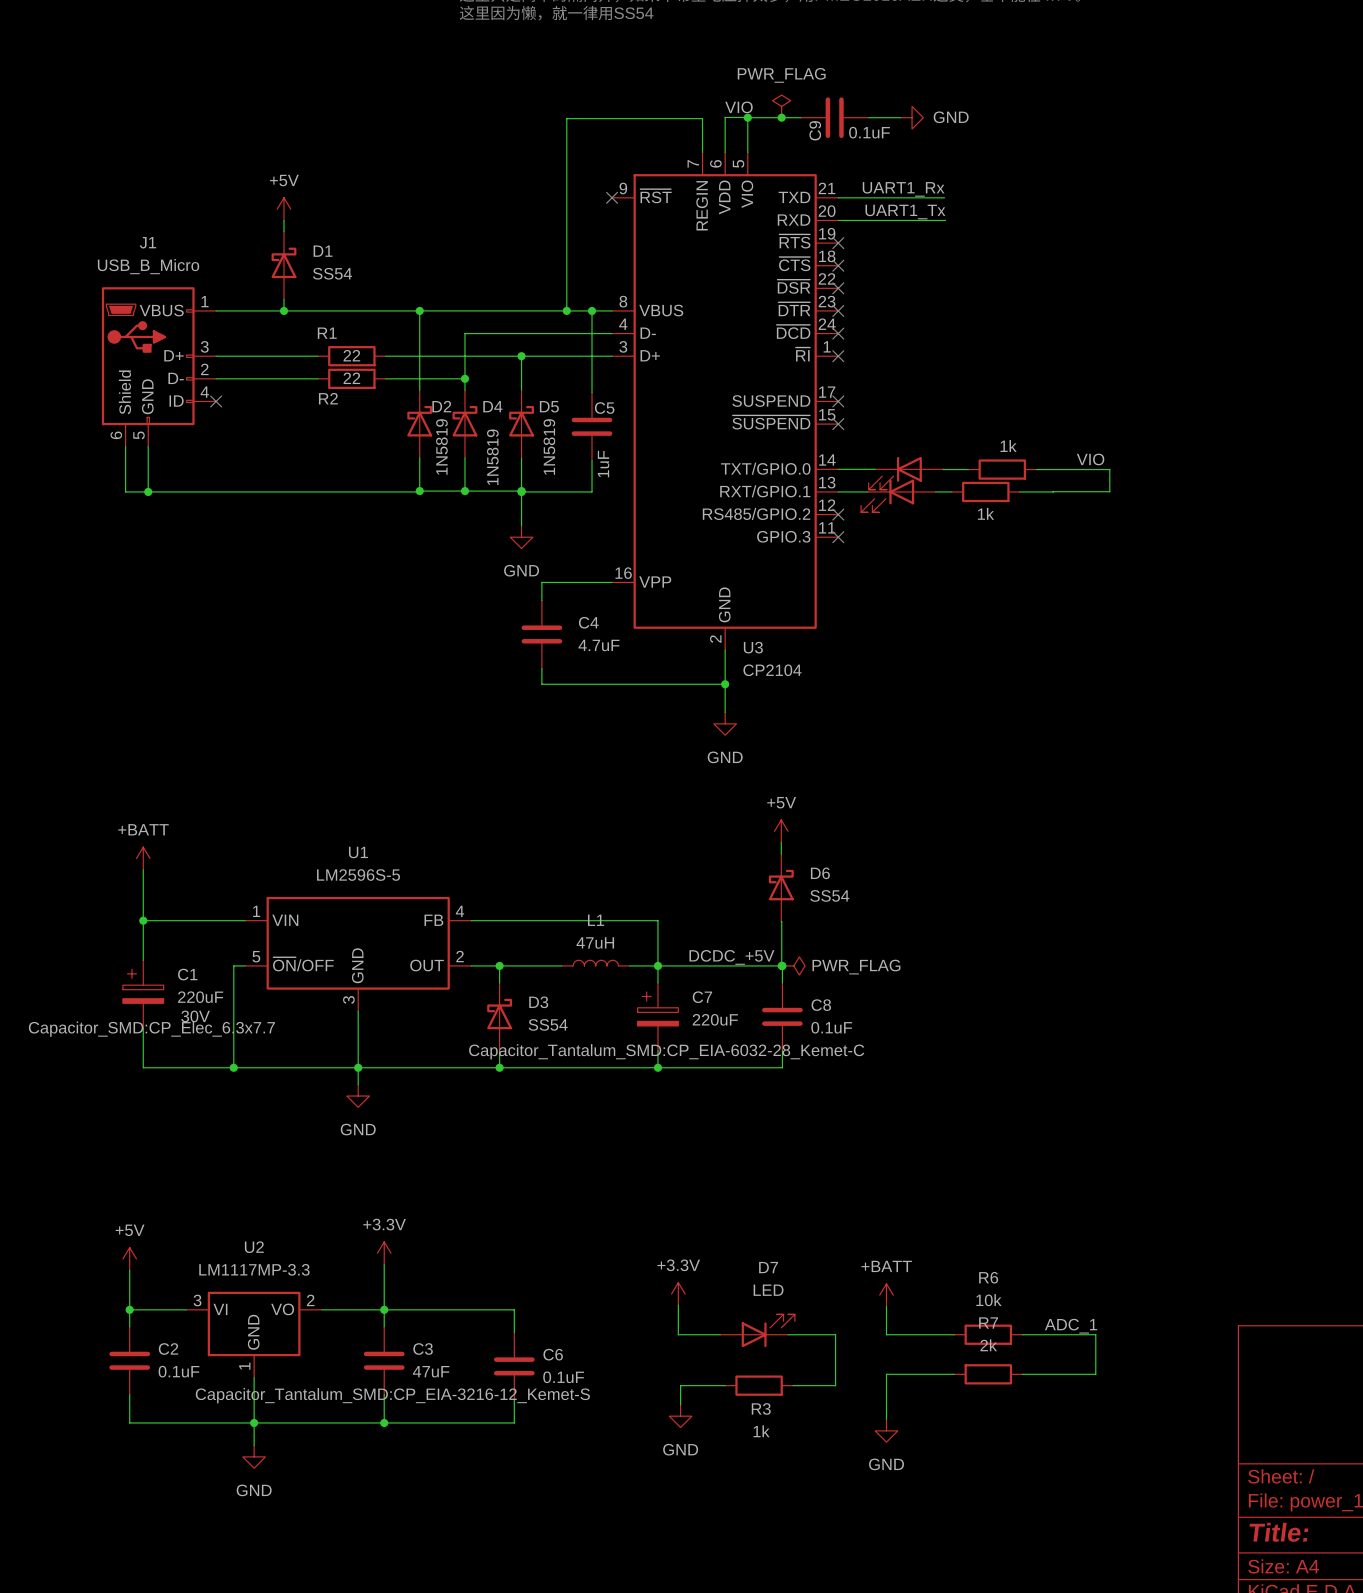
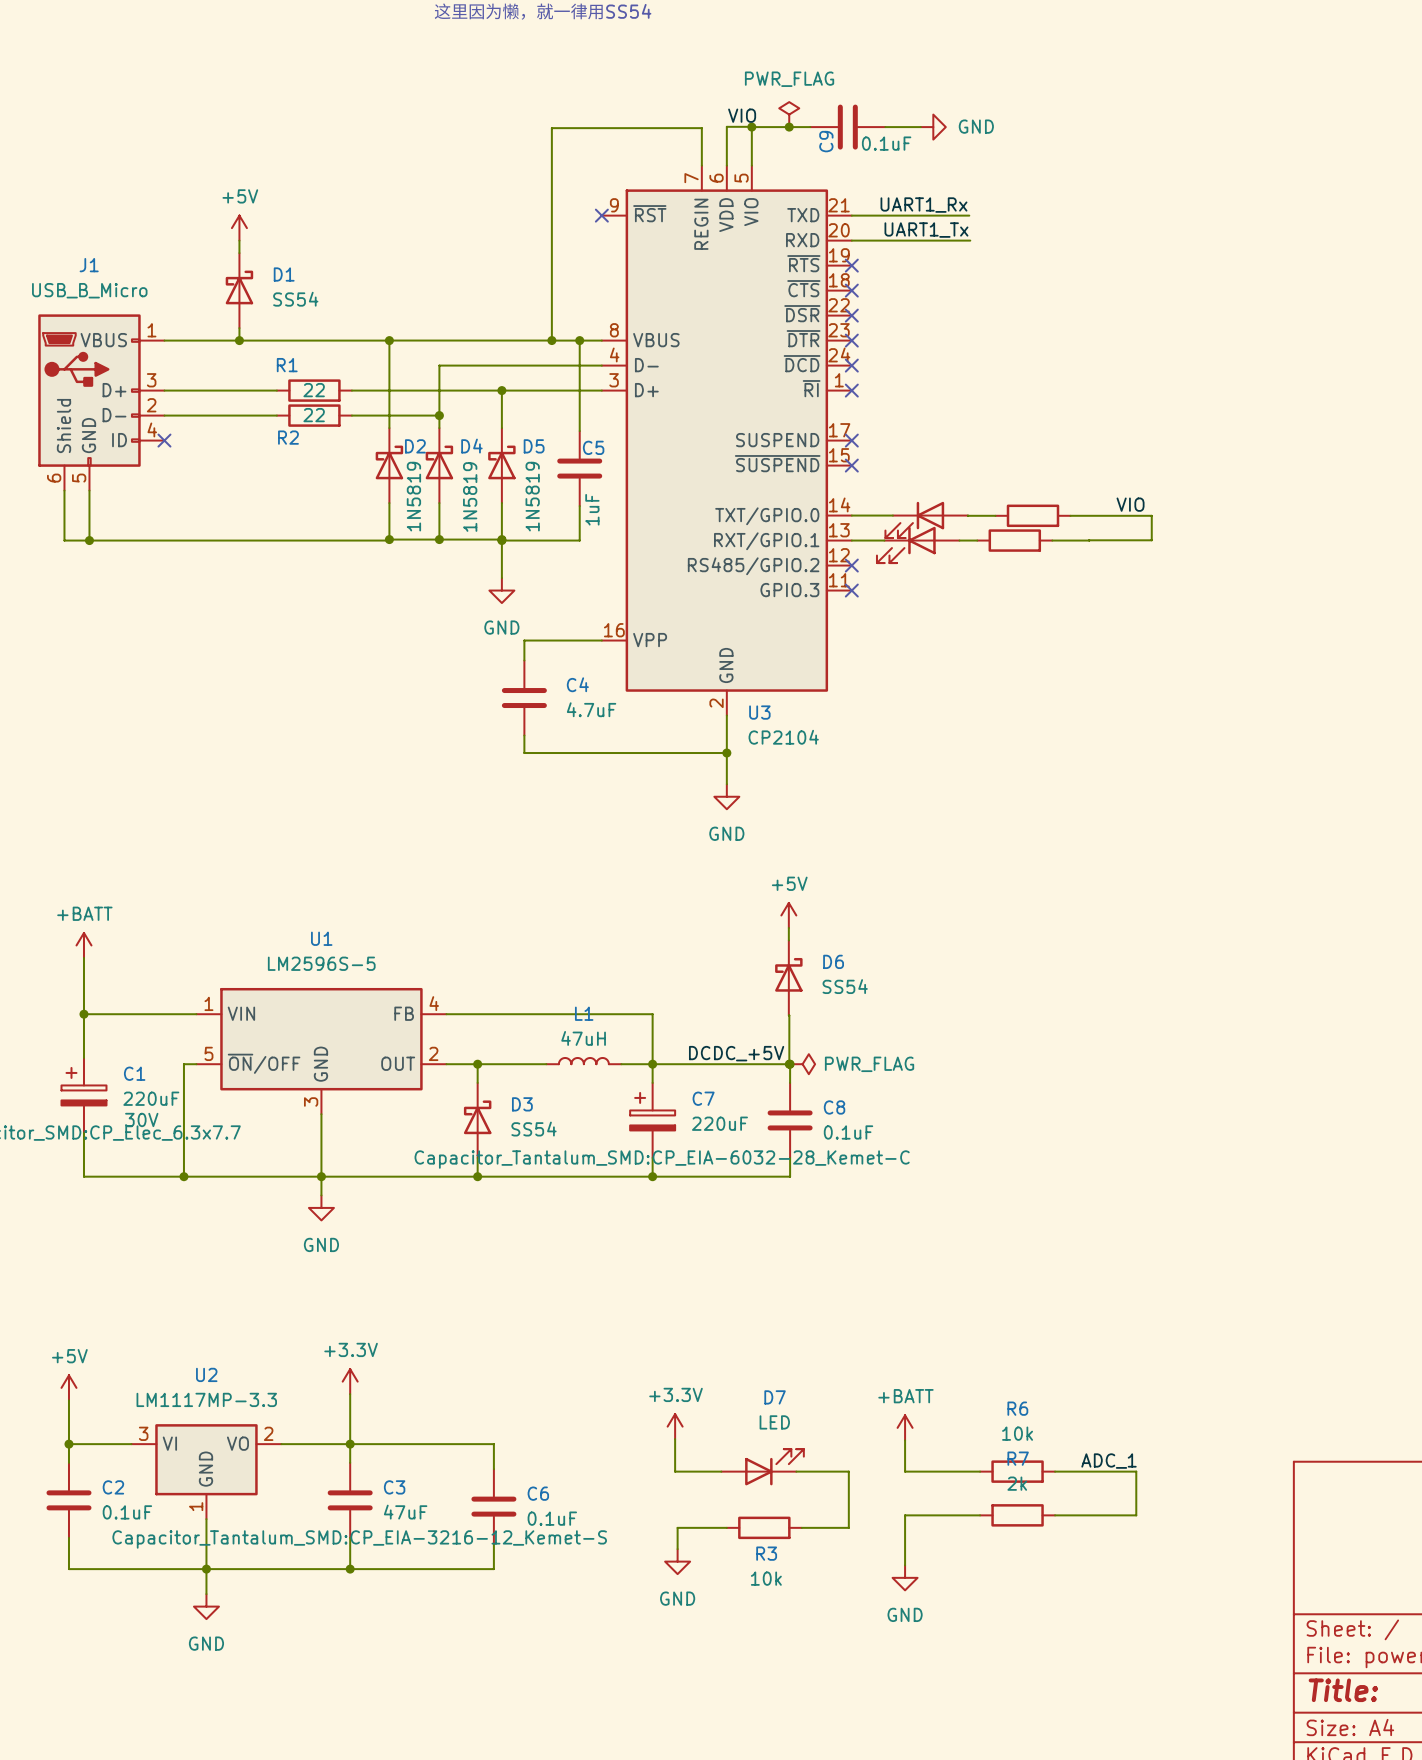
part value: 1k (1008, 445) -> none
part value: 1k (985, 513) -> none
R3 value: 1k (761, 1431) -> 10k (766, 1578)

